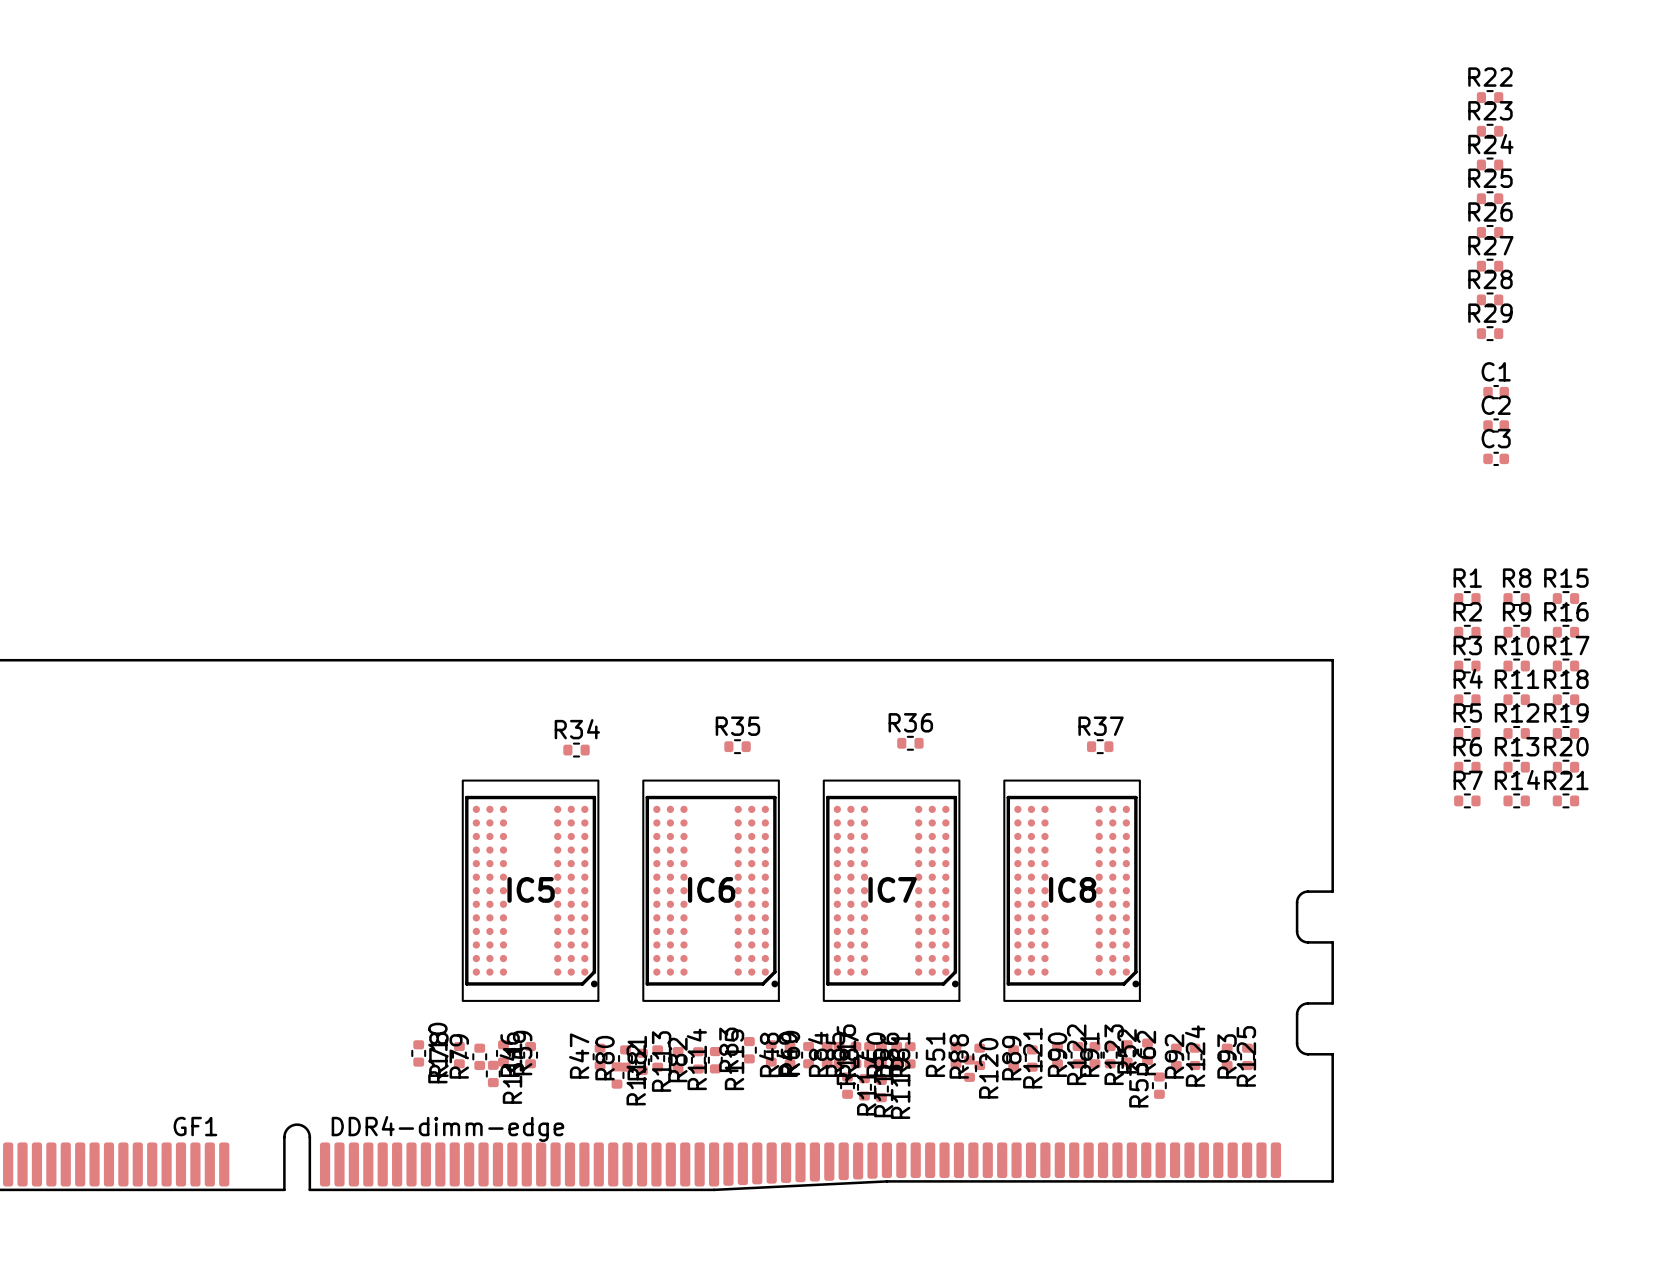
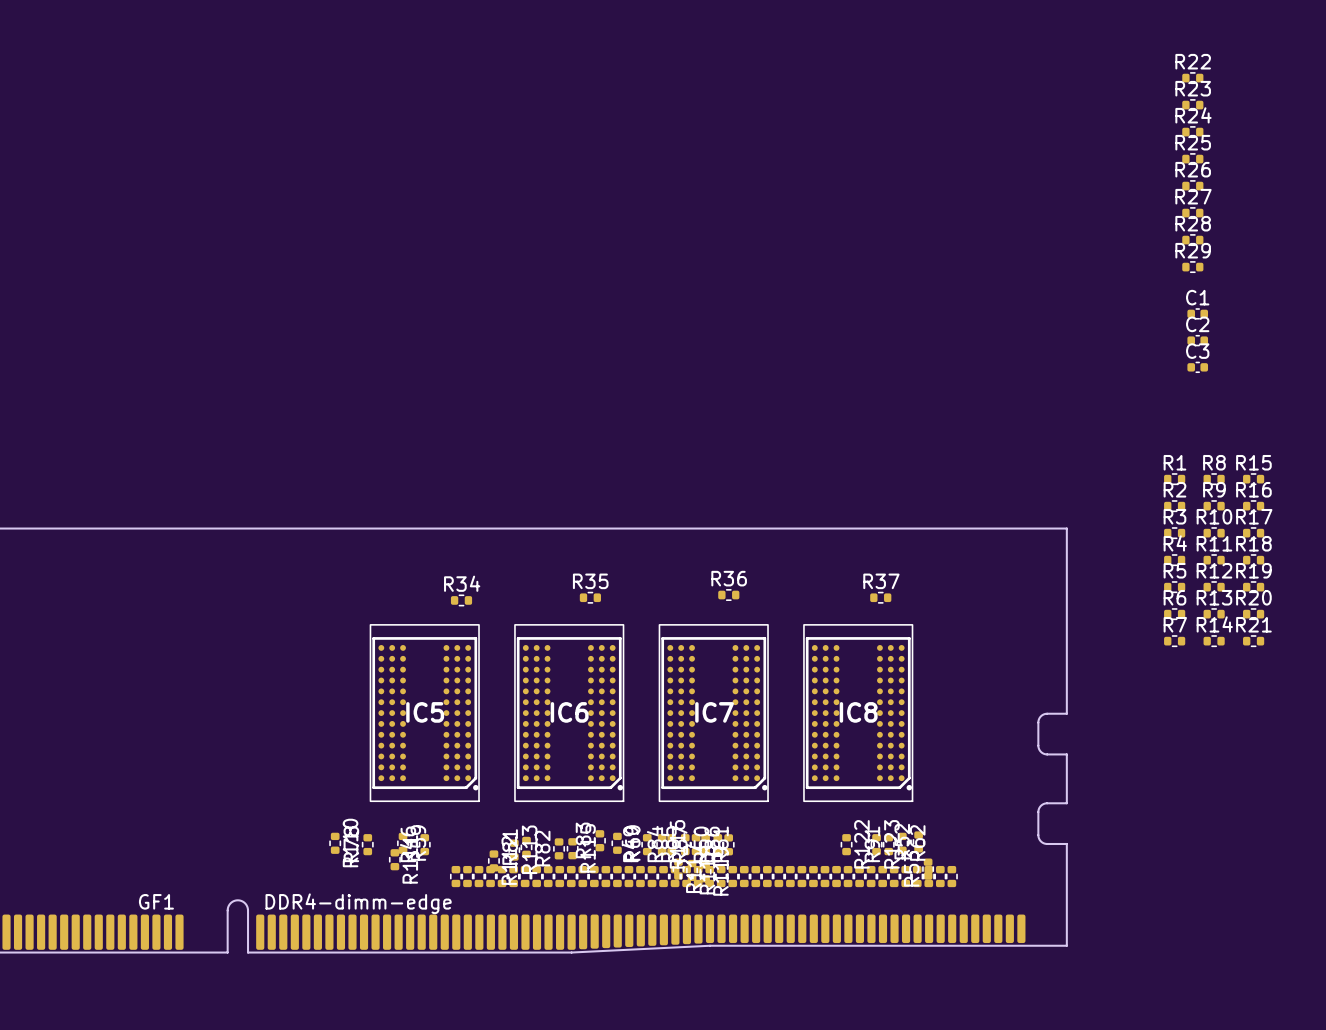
R48: (790, 1055) -> none
R51: (955, 1055) -> none
R90: (1078, 1055) -> none
R79: (479, 1056) -> none
R47: (600, 1056) -> none
R88: (979, 1056) -> none
R124: (1176, 1056) -> none
R92: (1194, 1056) -> none
R125: (1227, 1056) -> none
R93: (1247, 1056) -> none
R80: (625, 1058) -> none
R121: (1013, 1058) -> none
R89: (1032, 1058) -> none
R114: (678, 1060) -> none
R120: (969, 1068) -> none
part: none -> (455, 876)
part: none -> (467, 876)
part: none -> (479, 876)
part: none -> (490, 876)
part: none -> (502, 876)
part: none -> (513, 876)
part: none -> (525, 876)
part: none -> (536, 876)
part: none -> (548, 876)
part: none -> (559, 876)
part: none -> (571, 876)
part: none -> (582, 876)
part: none -> (594, 876)
part: none -> (605, 876)
part: none -> (617, 876)
part: none -> (628, 876)
part: none -> (640, 876)
part: none -> (652, 876)
part: none -> (663, 876)
part: none -> (675, 876)
part: none -> (686, 876)
part: none -> (698, 876)
part: none -> (709, 876)
part: none -> (721, 876)
part: none -> (732, 876)
part: none -> (744, 876)
part: none -> (755, 876)
part: none -> (767, 876)
part: none -> (778, 876)
part: none -> (790, 876)
part: none -> (801, 876)
part: none -> (813, 876)
part: none -> (825, 876)
part: none -> (836, 876)
part: none -> (848, 876)
part: none -> (859, 876)
part: none -> (871, 876)
part: none -> (882, 876)
part: none -> (894, 876)
part: none -> (905, 876)
part: none -> (917, 876)
part: none -> (928, 876)
part: none -> (940, 876)
part: none -> (951, 876)

